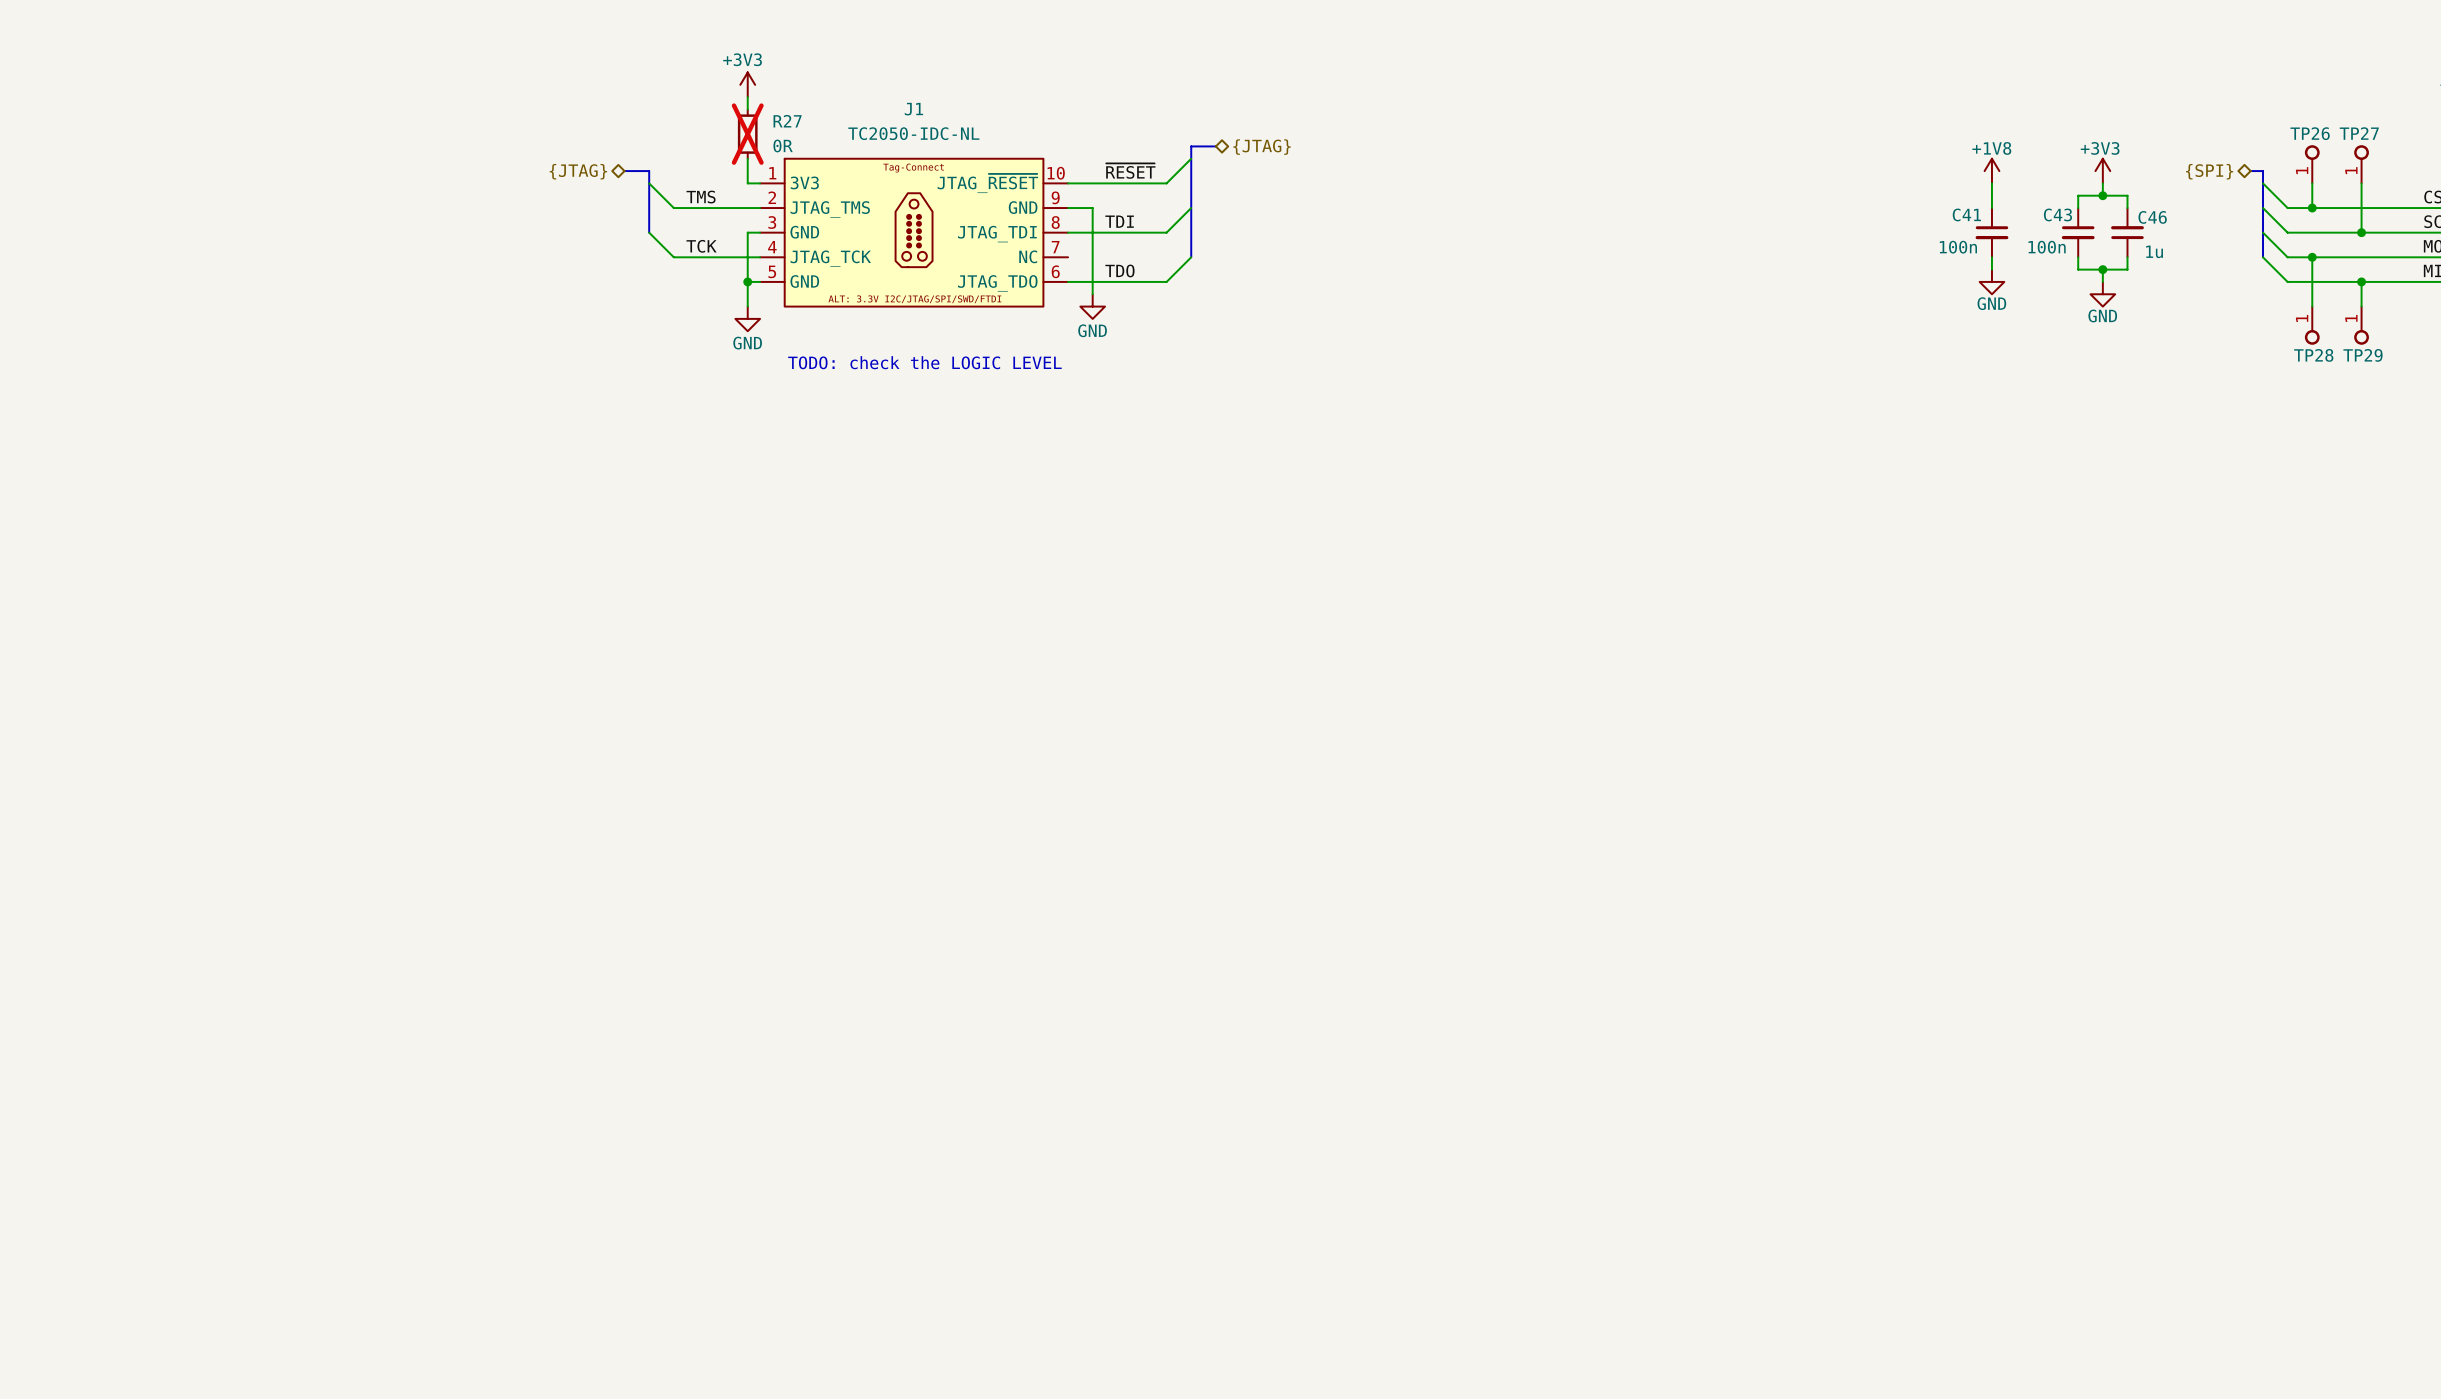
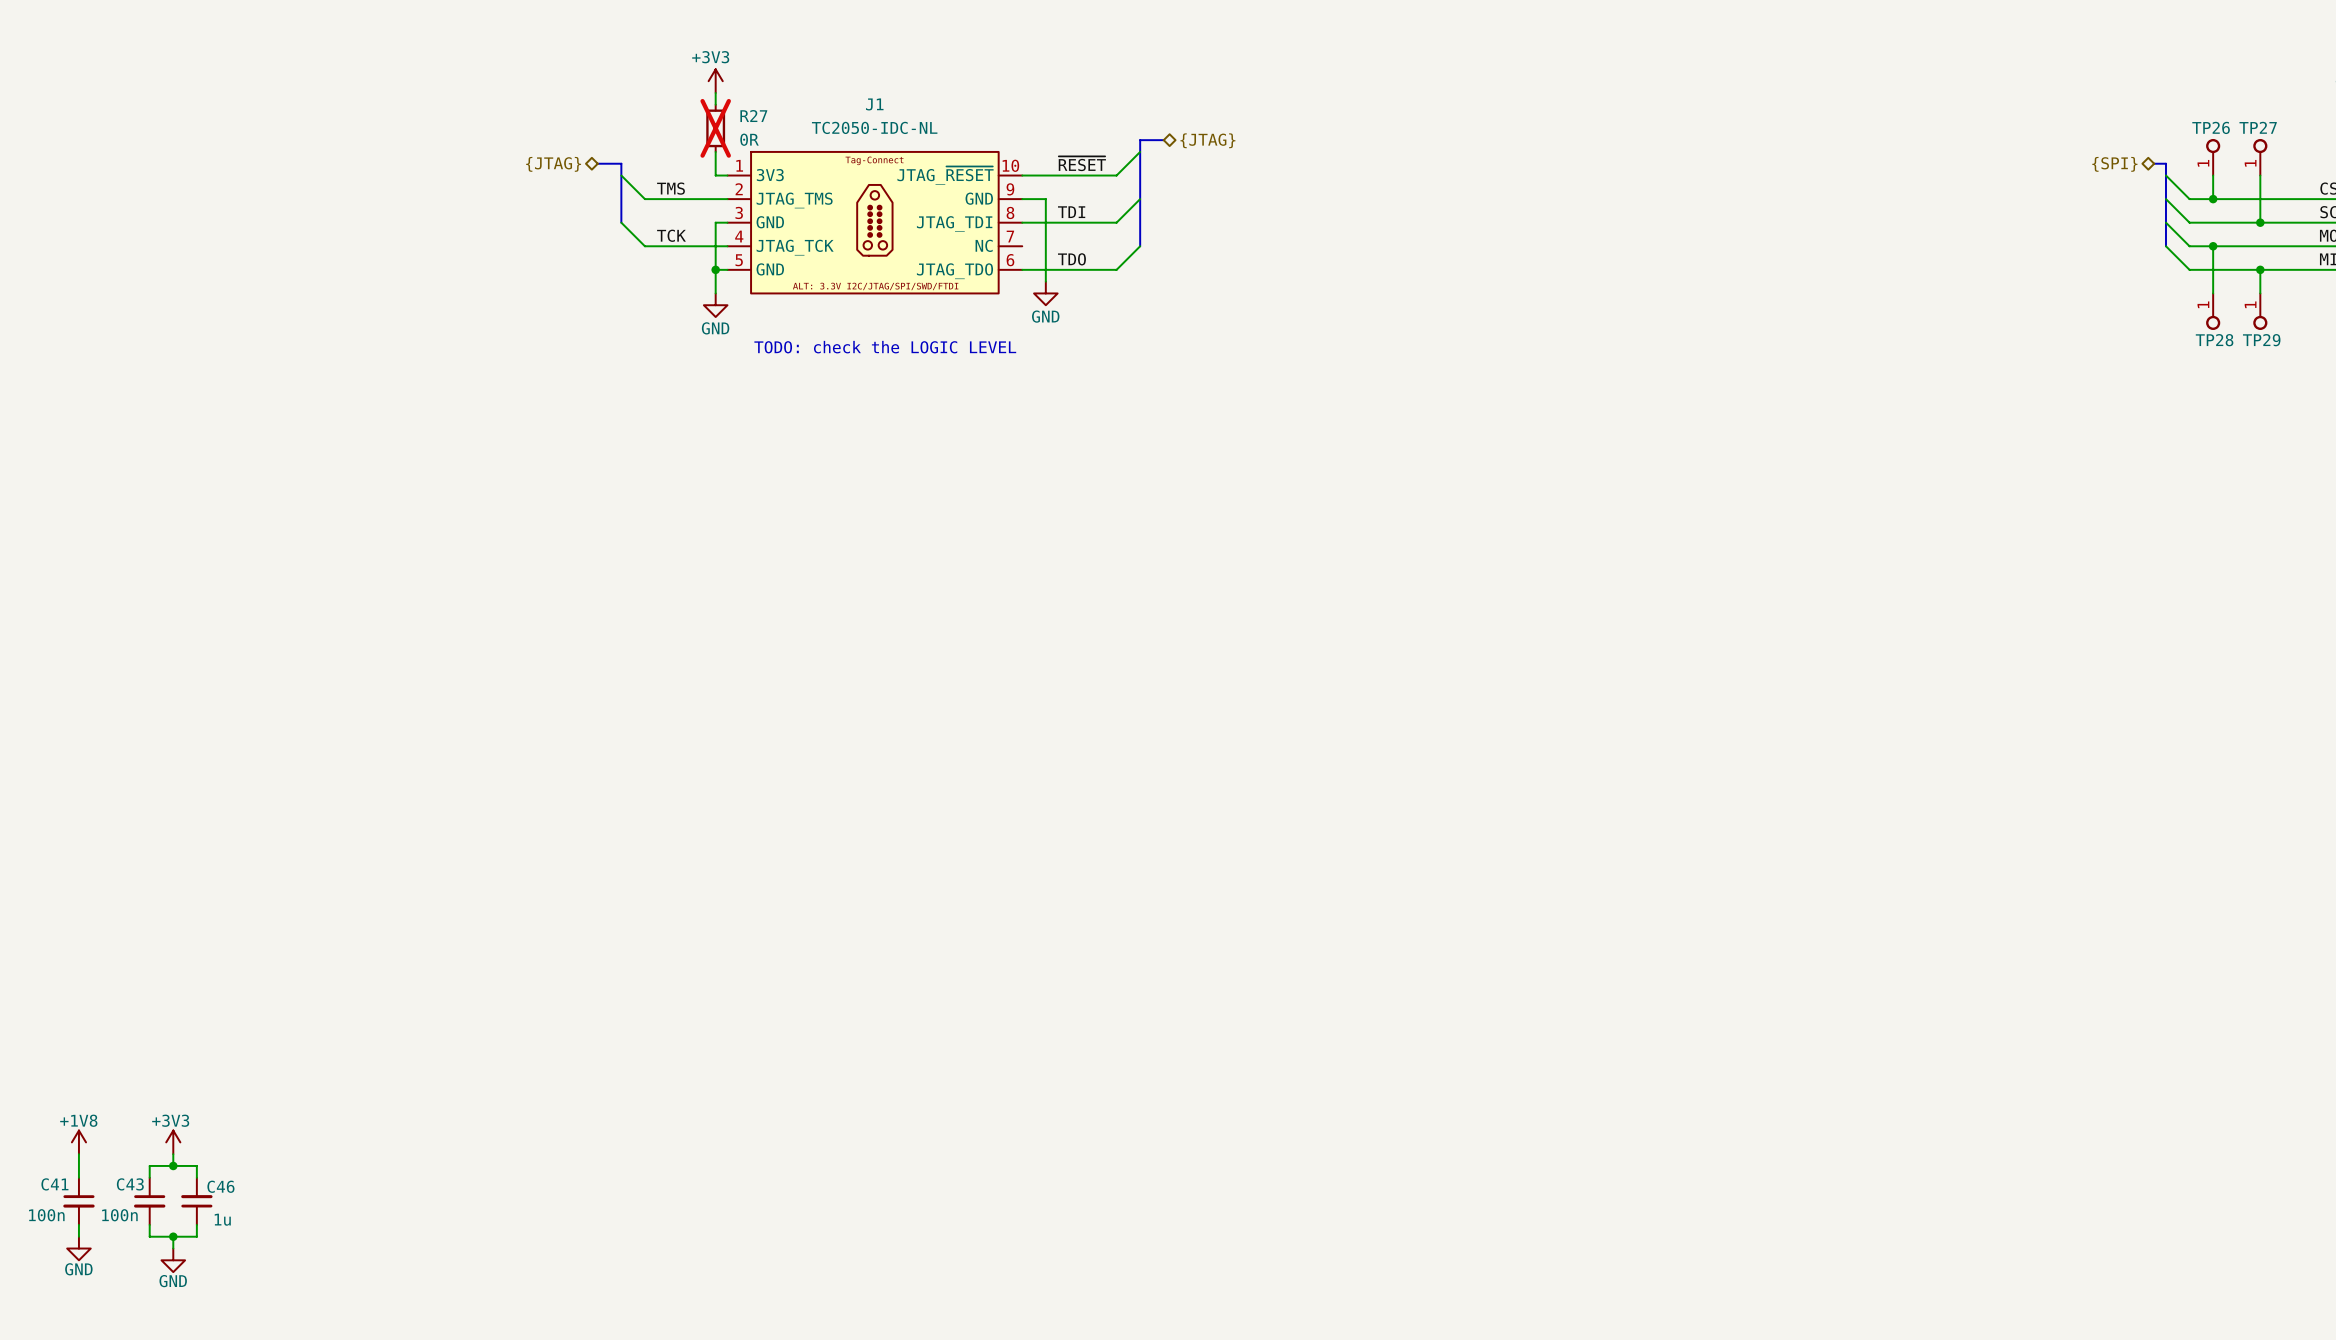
power symbol: +1V8 (1991, 171) -> none
power symbol: +3V3 (2102, 171) -> none
wire: (1991, 183) (1991, 208) -> none
wire: (2102, 183) (2102, 195) -> none
junction: (2102, 195) -> none
wire: (2078, 208) (2078, 195) (2127, 195) (2127, 208) -> none
C41 position: (1991, 232) -> (78, 1201)
C43 position: (2078, 232) -> (149, 1201)
C46 position: (2127, 232) -> (196, 1201)
wire: (1991, 257) (1991, 269) -> none
wire: (2078, 257) (2078, 269) (2127, 269) (2127, 257) -> none
wire: (2102, 269) (2102, 281) -> none
junction: (2102, 269) -> none
power symbol: GND (1991, 281) -> none
power symbol: GND (2102, 294) -> none
power symbol: none -> +1V8 (78, 1142)
power symbol: none -> +3V3 (173, 1142)
wire: none -> (78, 1154) (78, 1177)
wire: none -> (173, 1154) (173, 1165)
junction: none -> (173, 1165)
wire: none -> (149, 1177) (149, 1165) (196, 1165) (196, 1177)
wire: none -> (78, 1224) (78, 1236)
wire: none -> (149, 1224) (149, 1236) (196, 1236) (196, 1224)
wire: none -> (173, 1236) (173, 1248)
junction: none -> (173, 1236)
power symbol: none -> GND (78, 1248)
power symbol: none -> GND (173, 1260)

